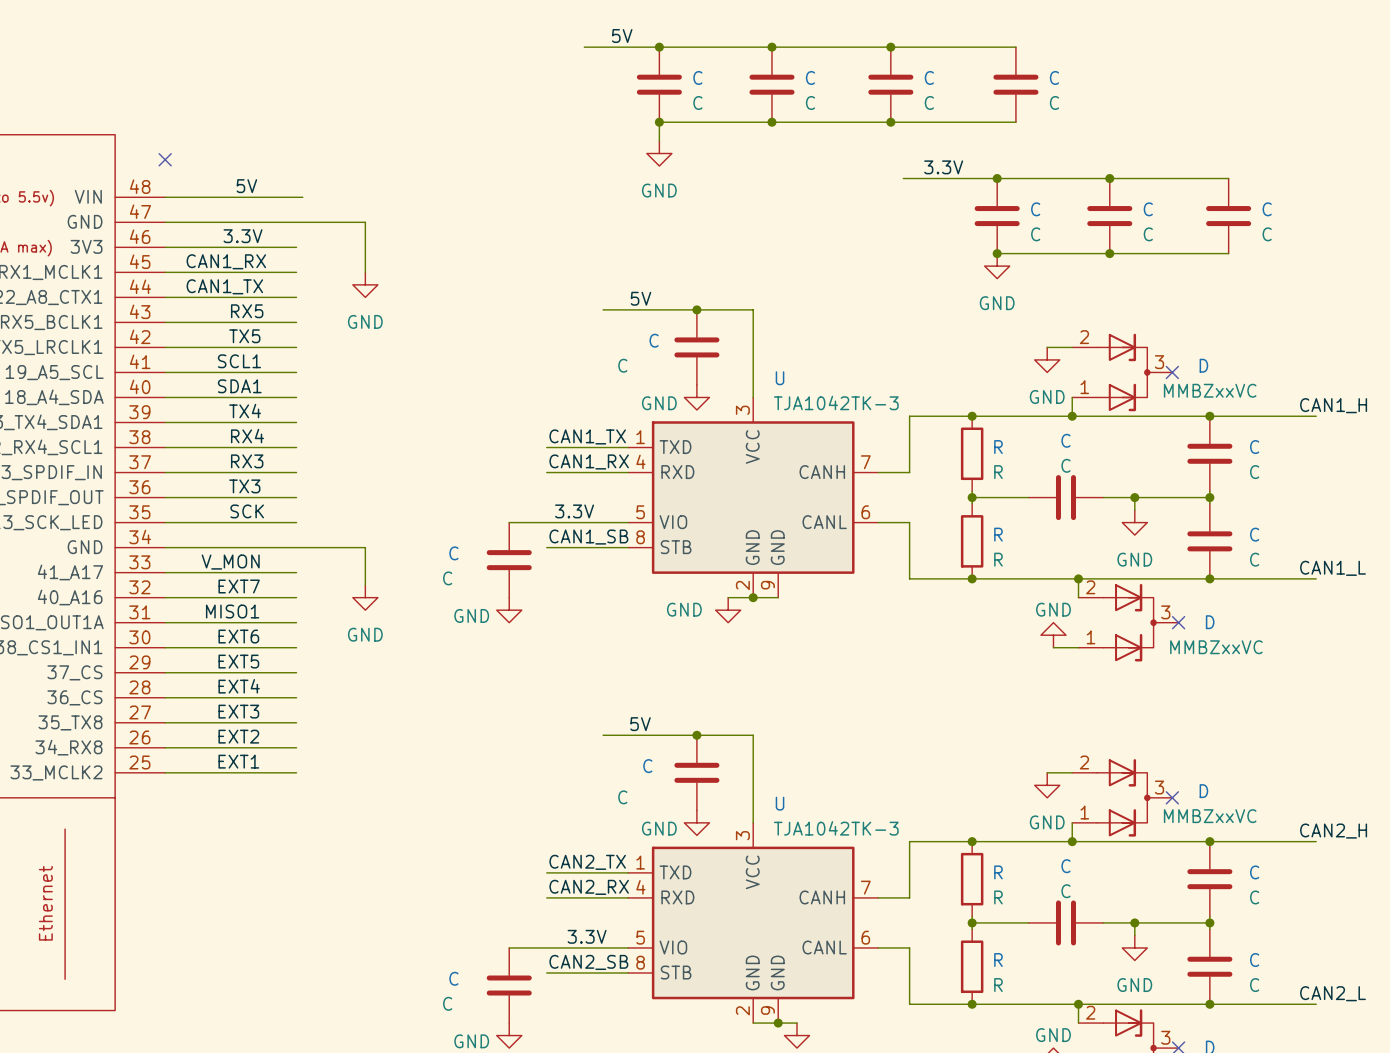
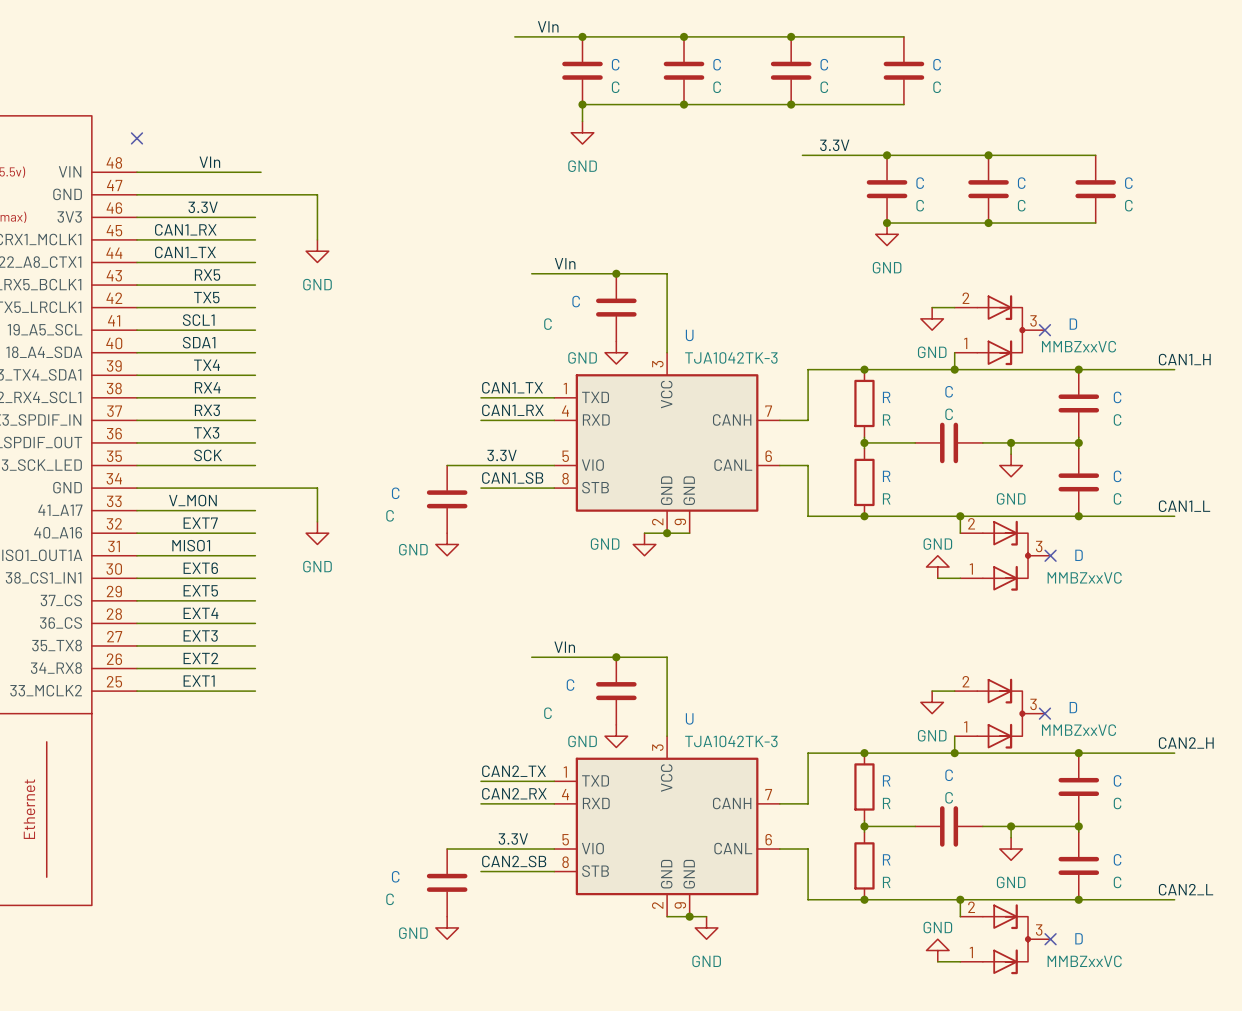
label: 5V (622, 35) -> VIn (548, 26)
label: 5V (246, 186) -> VIn (209, 162)
label: 5V (640, 298) -> VIn (565, 263)
label: 5V (640, 724) -> VIn (564, 647)

